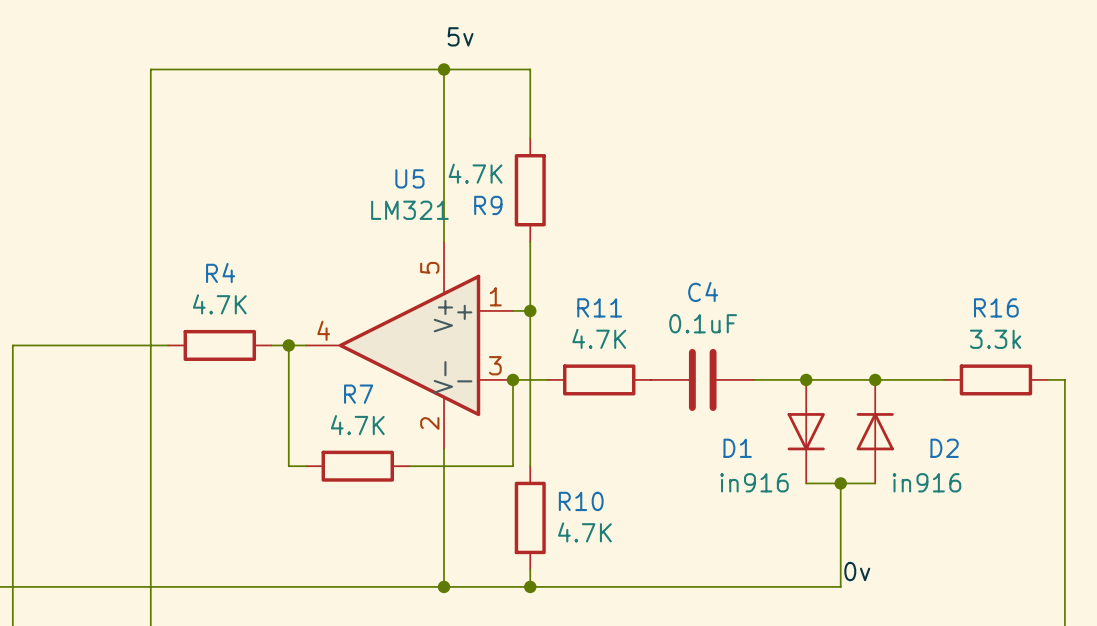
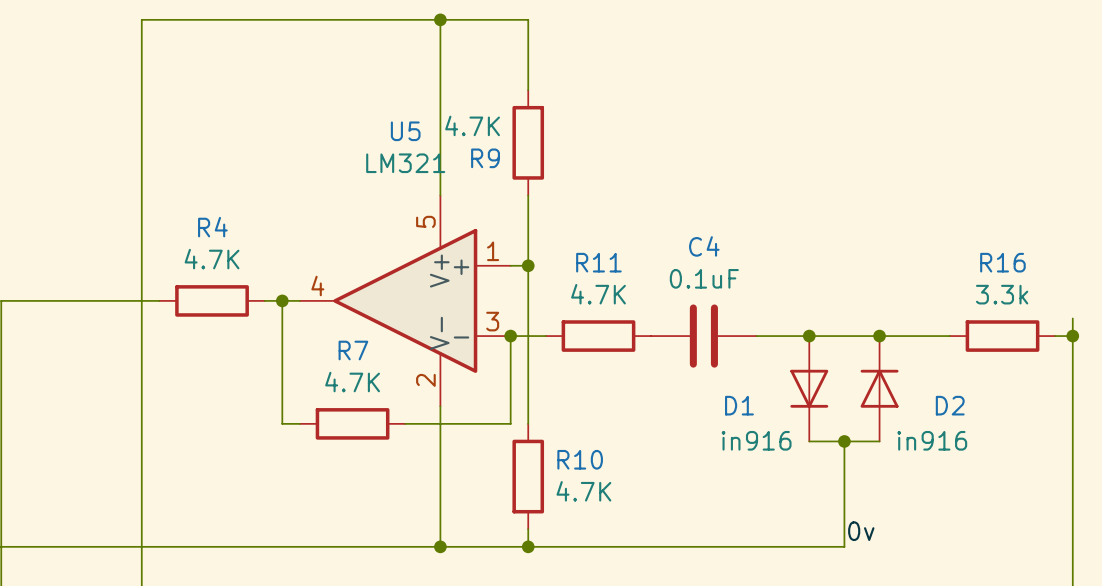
wire: none -> (1072, 318) (1072, 336)
junction: none -> (1072, 336)

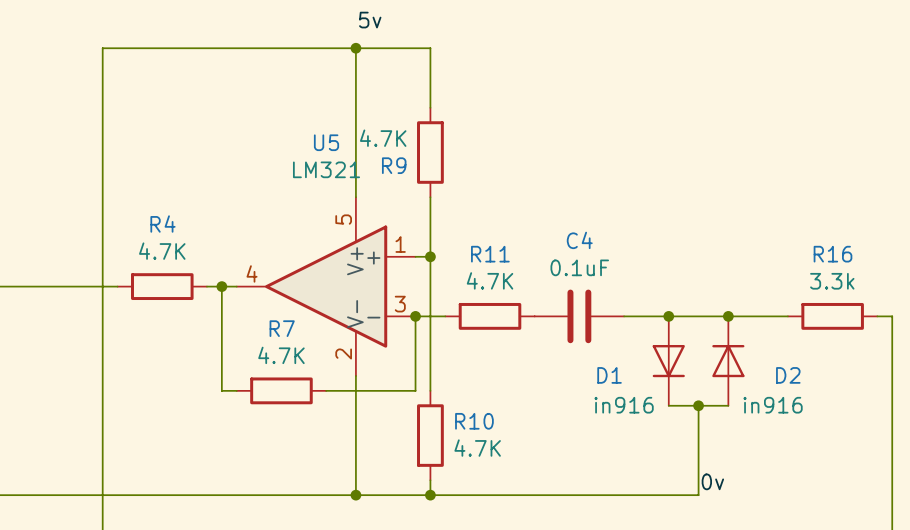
wire: (1072, 318) (1072, 336) -> none
junction: (1072, 336) -> none

